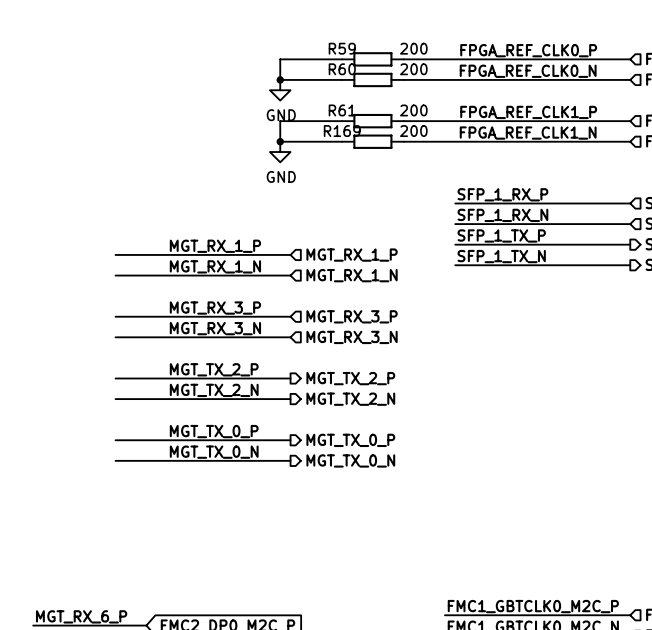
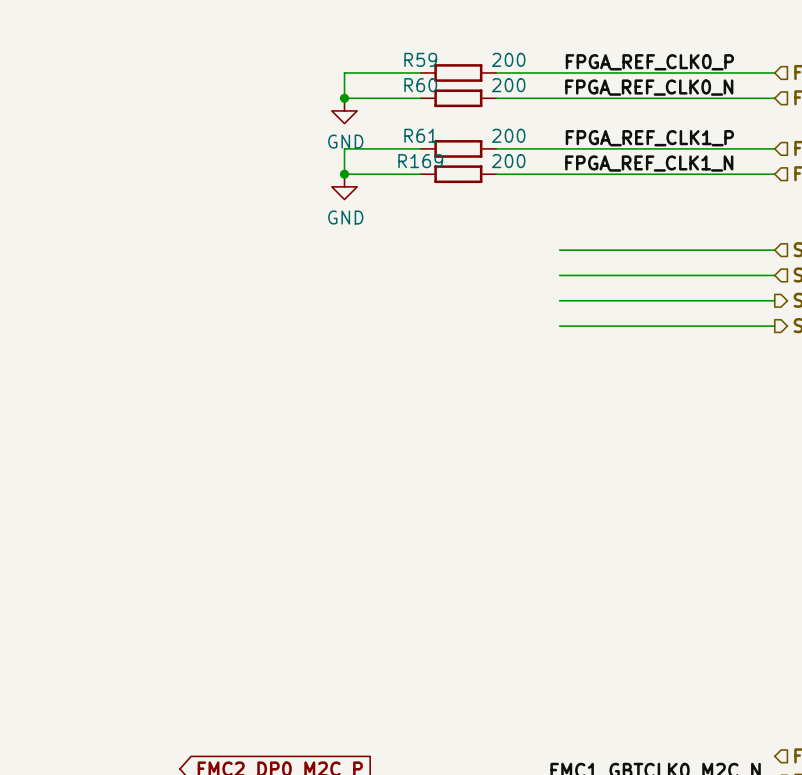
label: SFP_1_RX_P (502, 194) -> none
label: SFP_1_RX_N (502, 215) -> none
label: SFP_1_TX_P (501, 235) -> none
label: MGT_RX_1_P (215, 246) -> none
wire: (115, 254) (290, 254) -> none
hierarchical label: MGT_RX_1_P (352, 255) -> none
label: SFP_1_TX_N (501, 256) -> none
label: MGT_RX_1_N (215, 266) -> none
wire: (115, 275) (290, 275) -> none
hierarchical label: MGT_RX_1_N (352, 275) -> none
label: MGT_RX_3_P (215, 308) -> none
wire: (115, 316) (290, 316) -> none
hierarchical label: MGT_RX_3_P (352, 316) -> none
label: MGT_RX_3_N (215, 328) -> none
wire: (115, 337) (290, 337) -> none
hierarchical label: MGT_RX_3_N (352, 337) -> none
label: MGT_TX_2_P (214, 369) -> none
wire: (115, 378) (290, 378) -> none
hierarchical label: MGT_TX_2_P (350, 378) -> none
label: MGT_TX_2_N (214, 390) -> none
wire: (115, 399) (290, 399) -> none
hierarchical label: MGT_TX_2_N (350, 399) -> none
label: MGT_TX_0_P (214, 431) -> none
wire: (115, 440) (290, 440) -> none
hierarchical label: MGT_TX_0_P (350, 440) -> none
label: MGT_TX_0_N (214, 452) -> none
wire: (115, 460) (290, 460) -> none
hierarchical label: MGT_TX_0_N (350, 460) -> none
label: FMC1_GBTCLK0_M2C_P (533, 606) -> none
wire: (444, 615) (630, 615) -> none
label: MGT_RX_6_P (81, 616) -> none
wire: (33, 625) (146, 625) -> none

